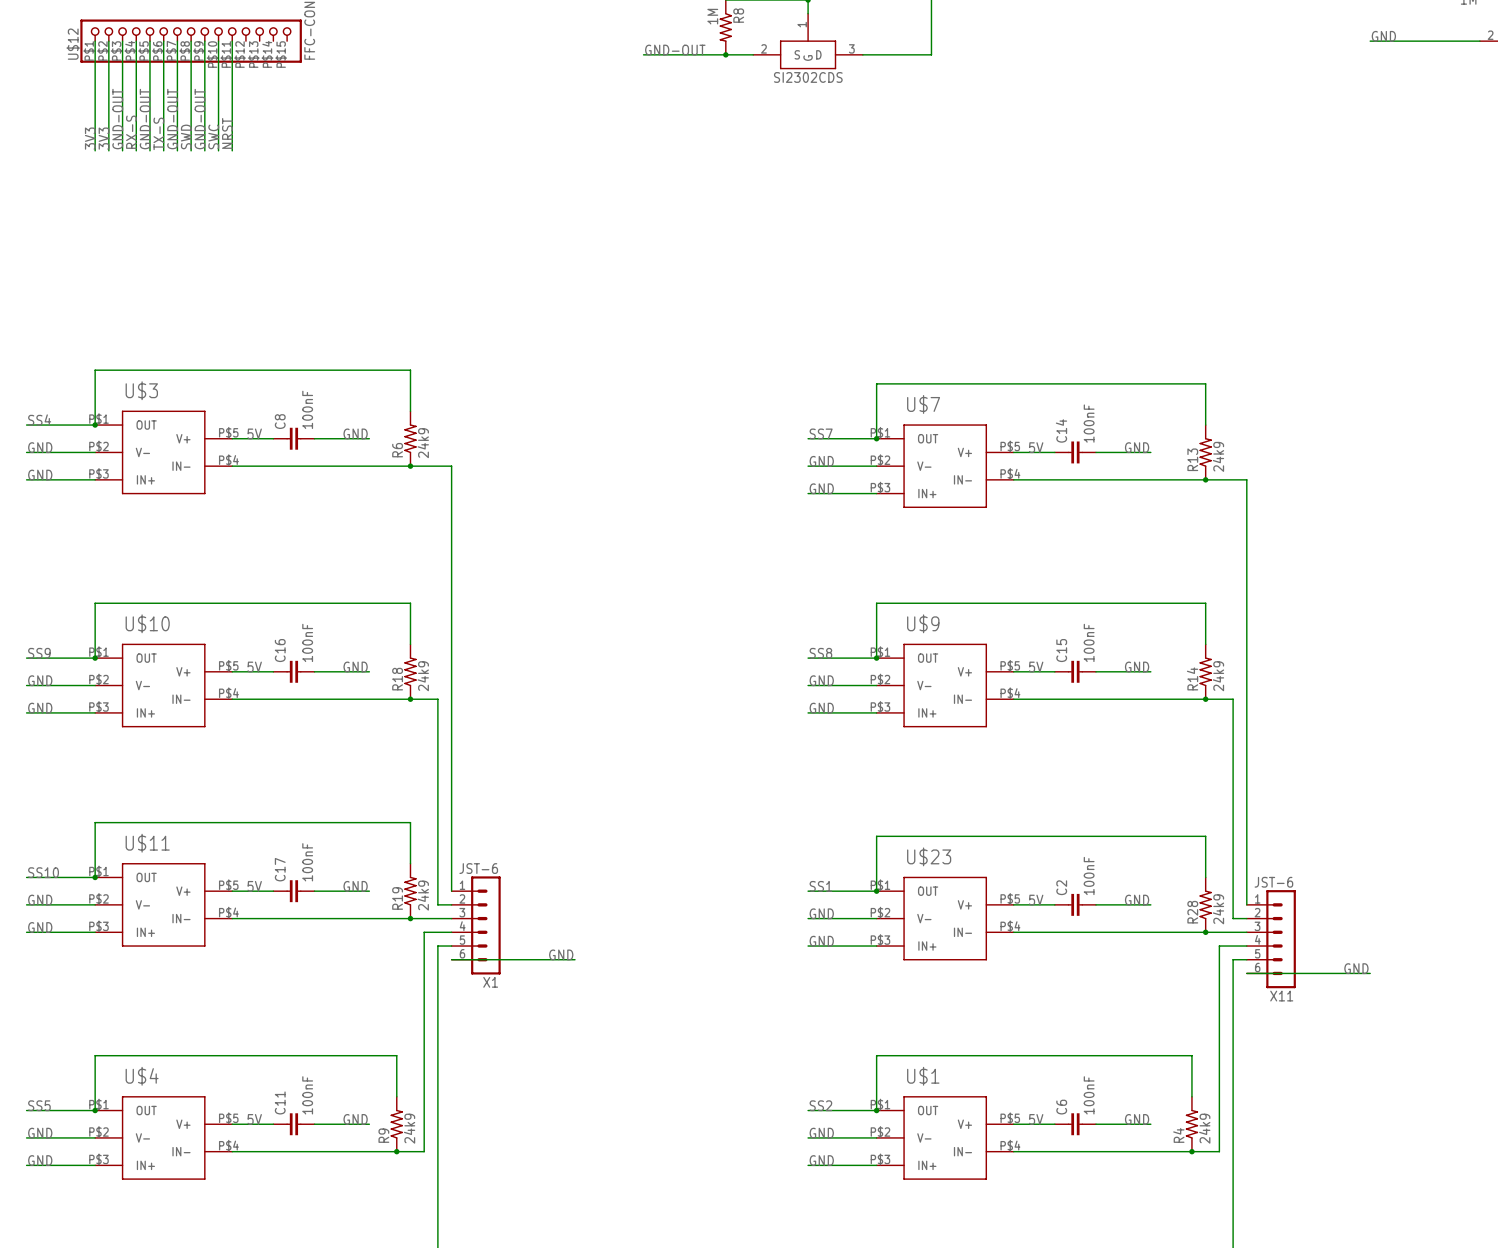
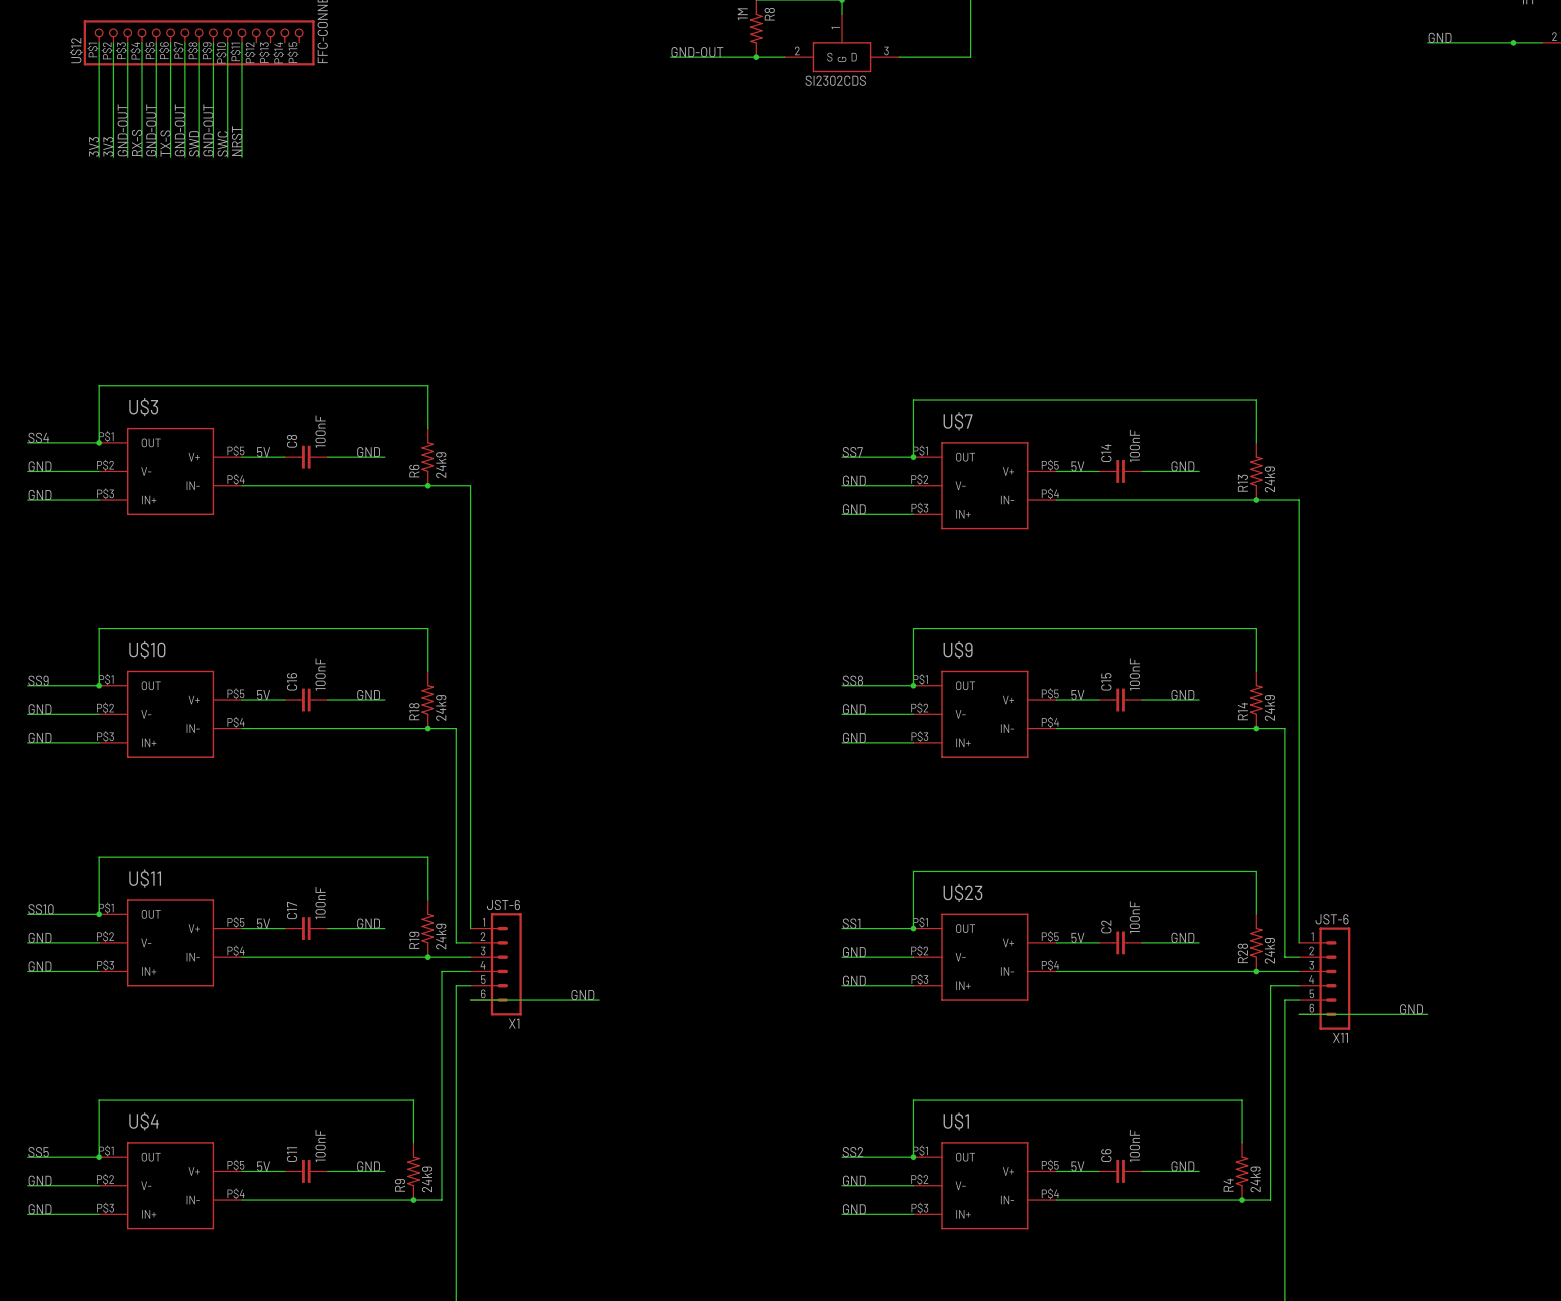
junction: none -> (1513, 42)

